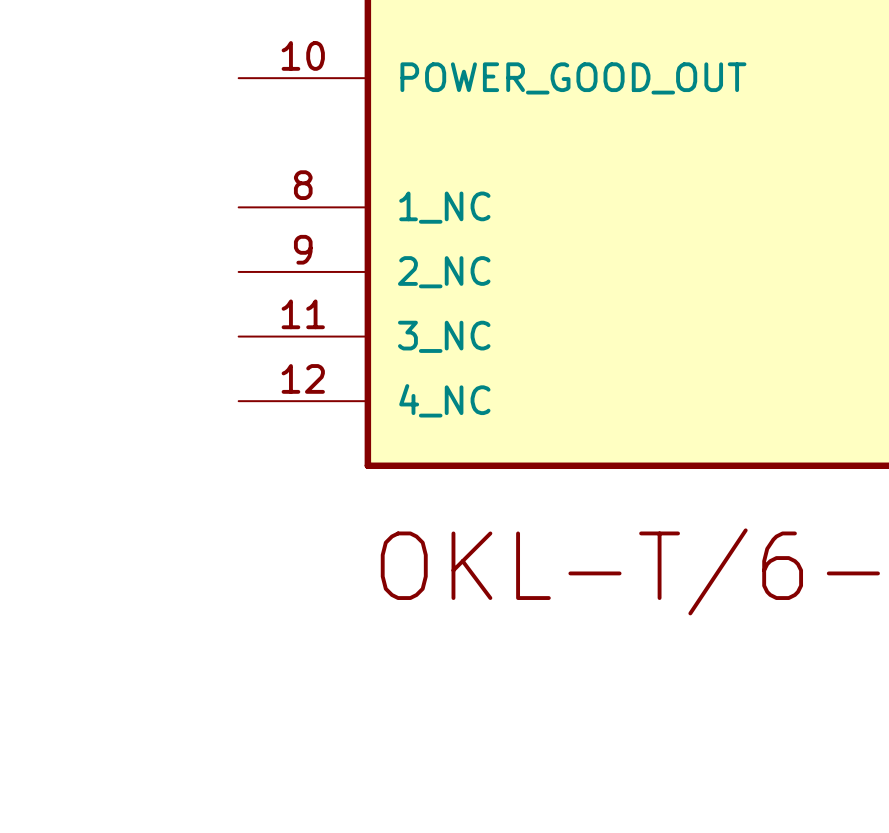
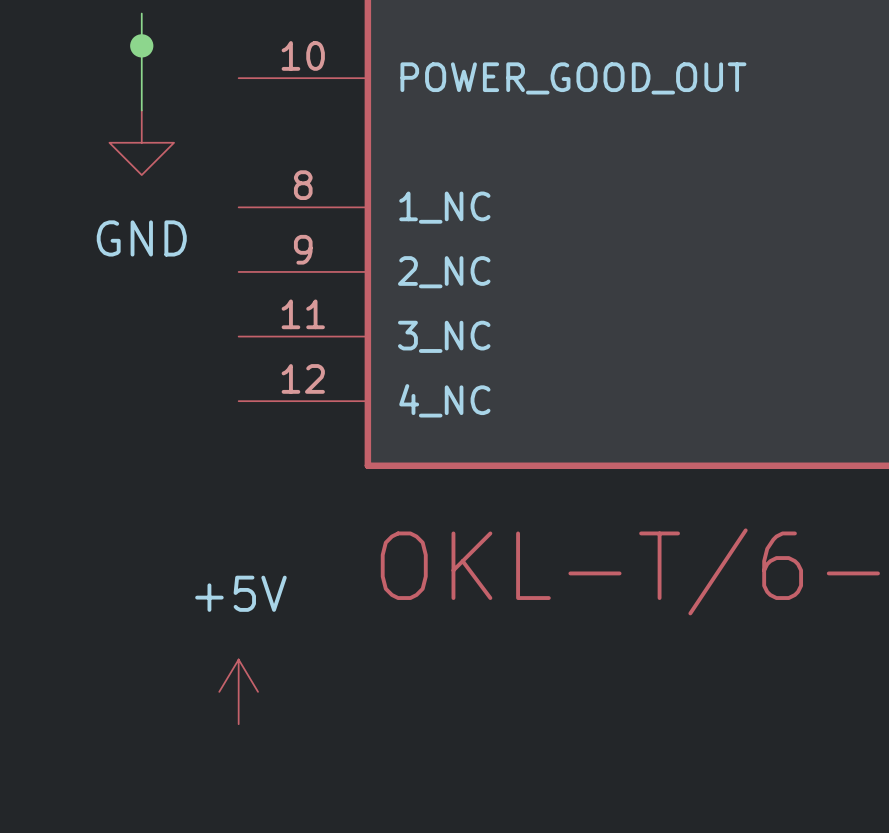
wire: none -> (141, 13) (141, 110)
junction: none -> (141, 45)
power symbol: none -> GND (141, 142)
power symbol: none -> +5V (238, 691)

